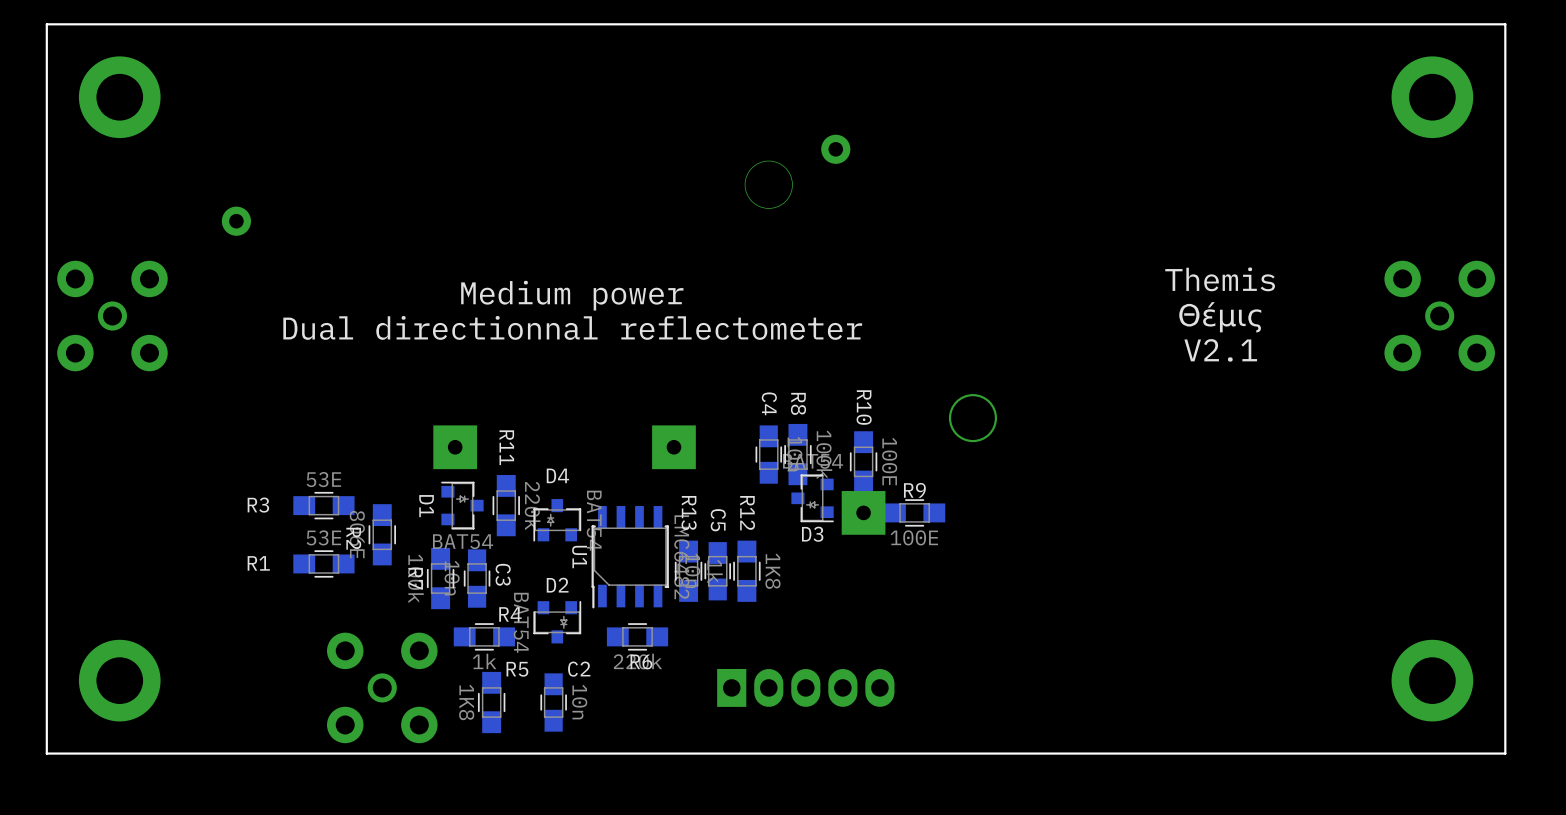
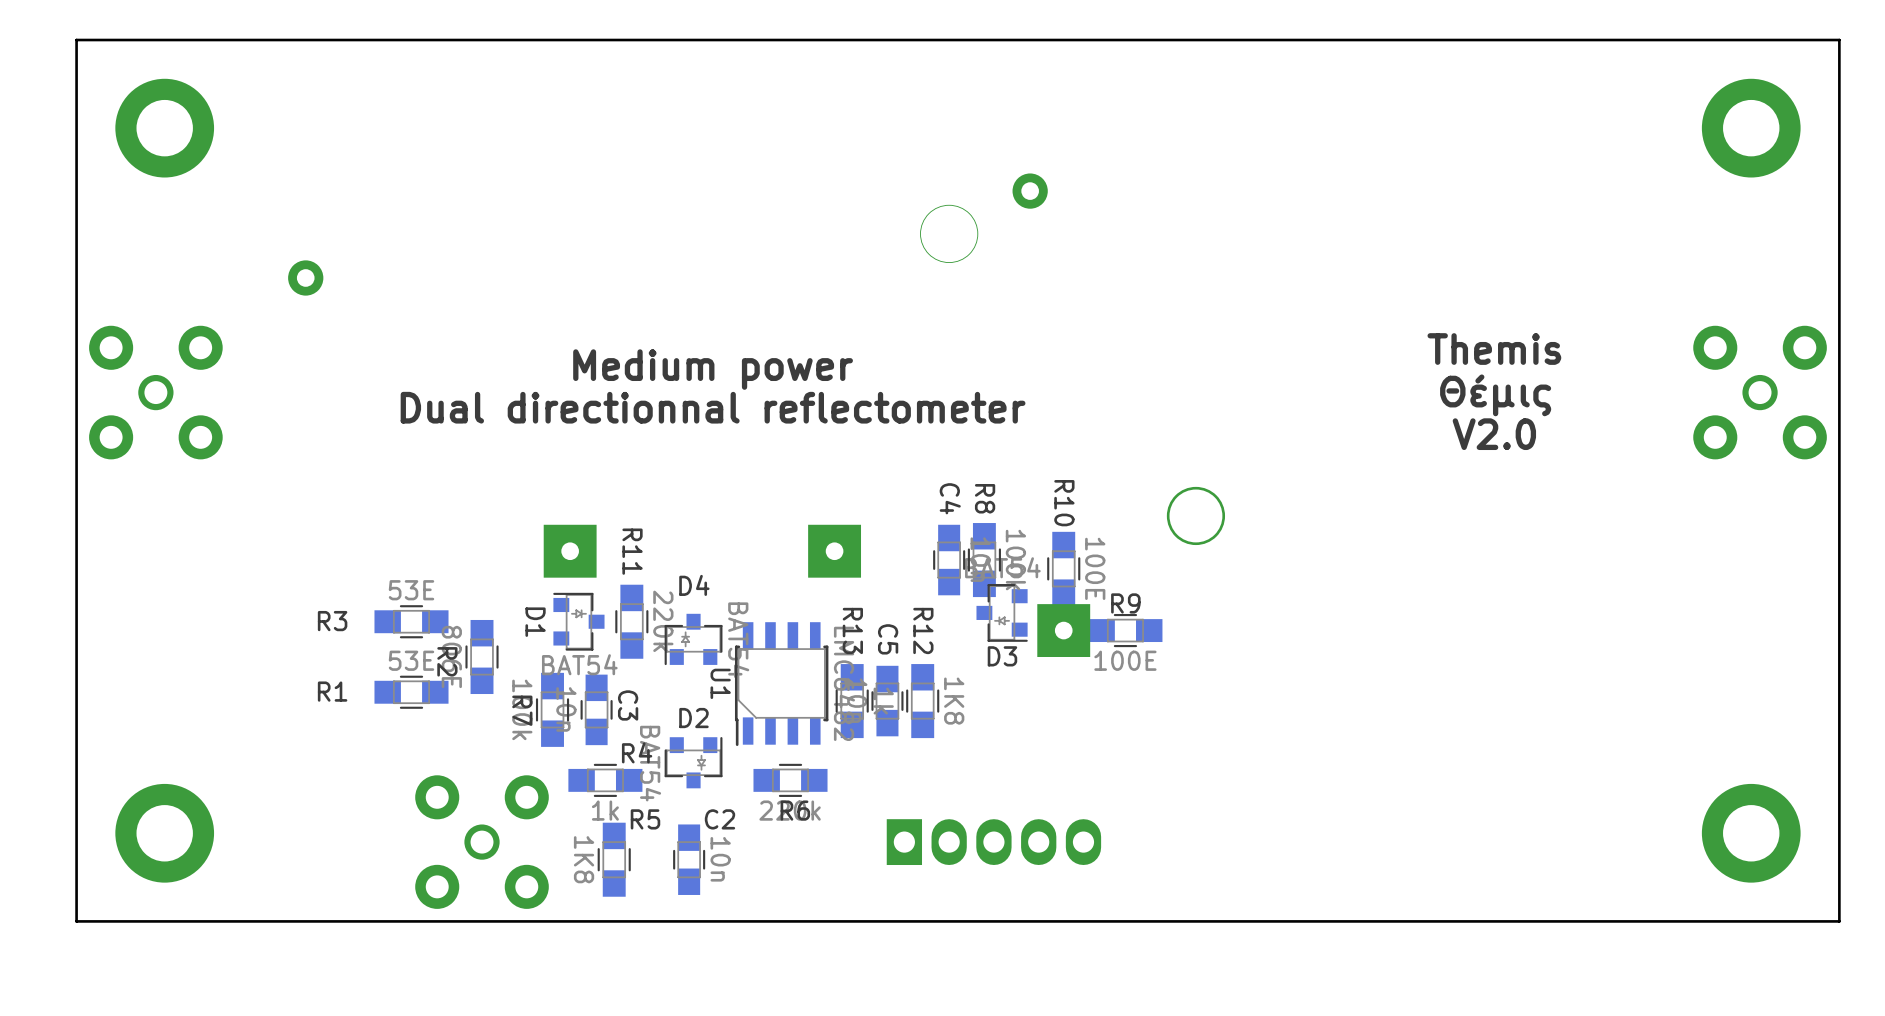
text: V2.1 (1220, 350) -> V2.0 (1494, 434)

